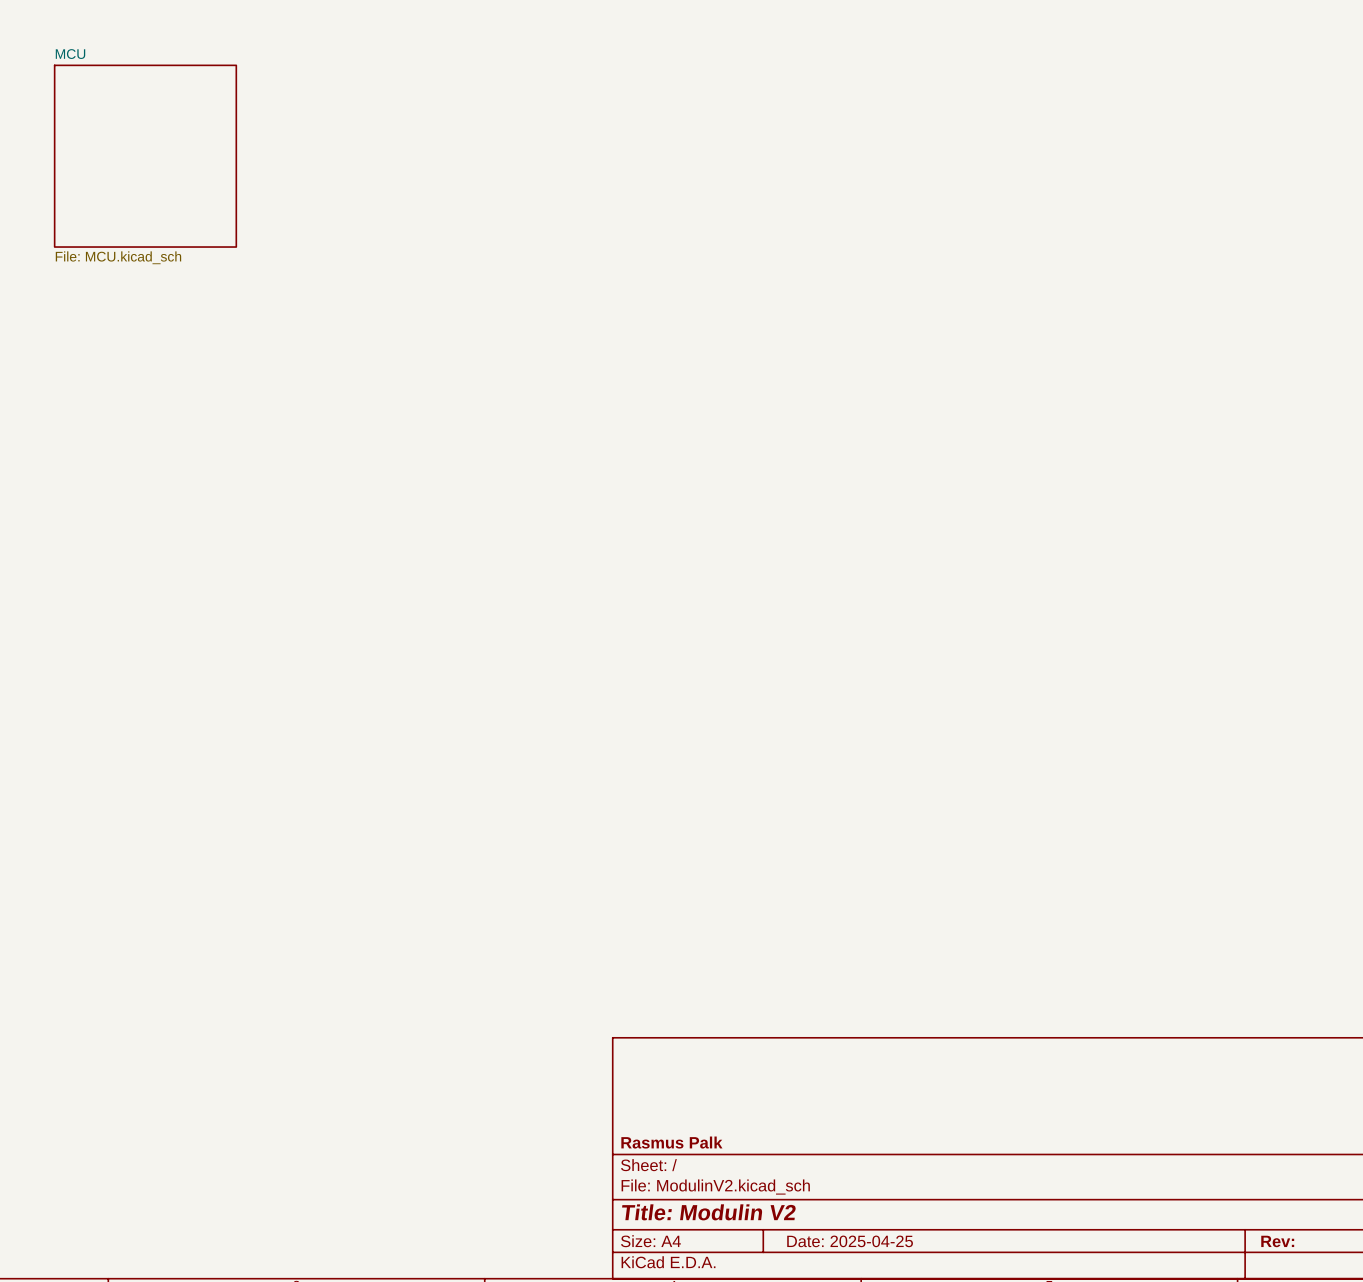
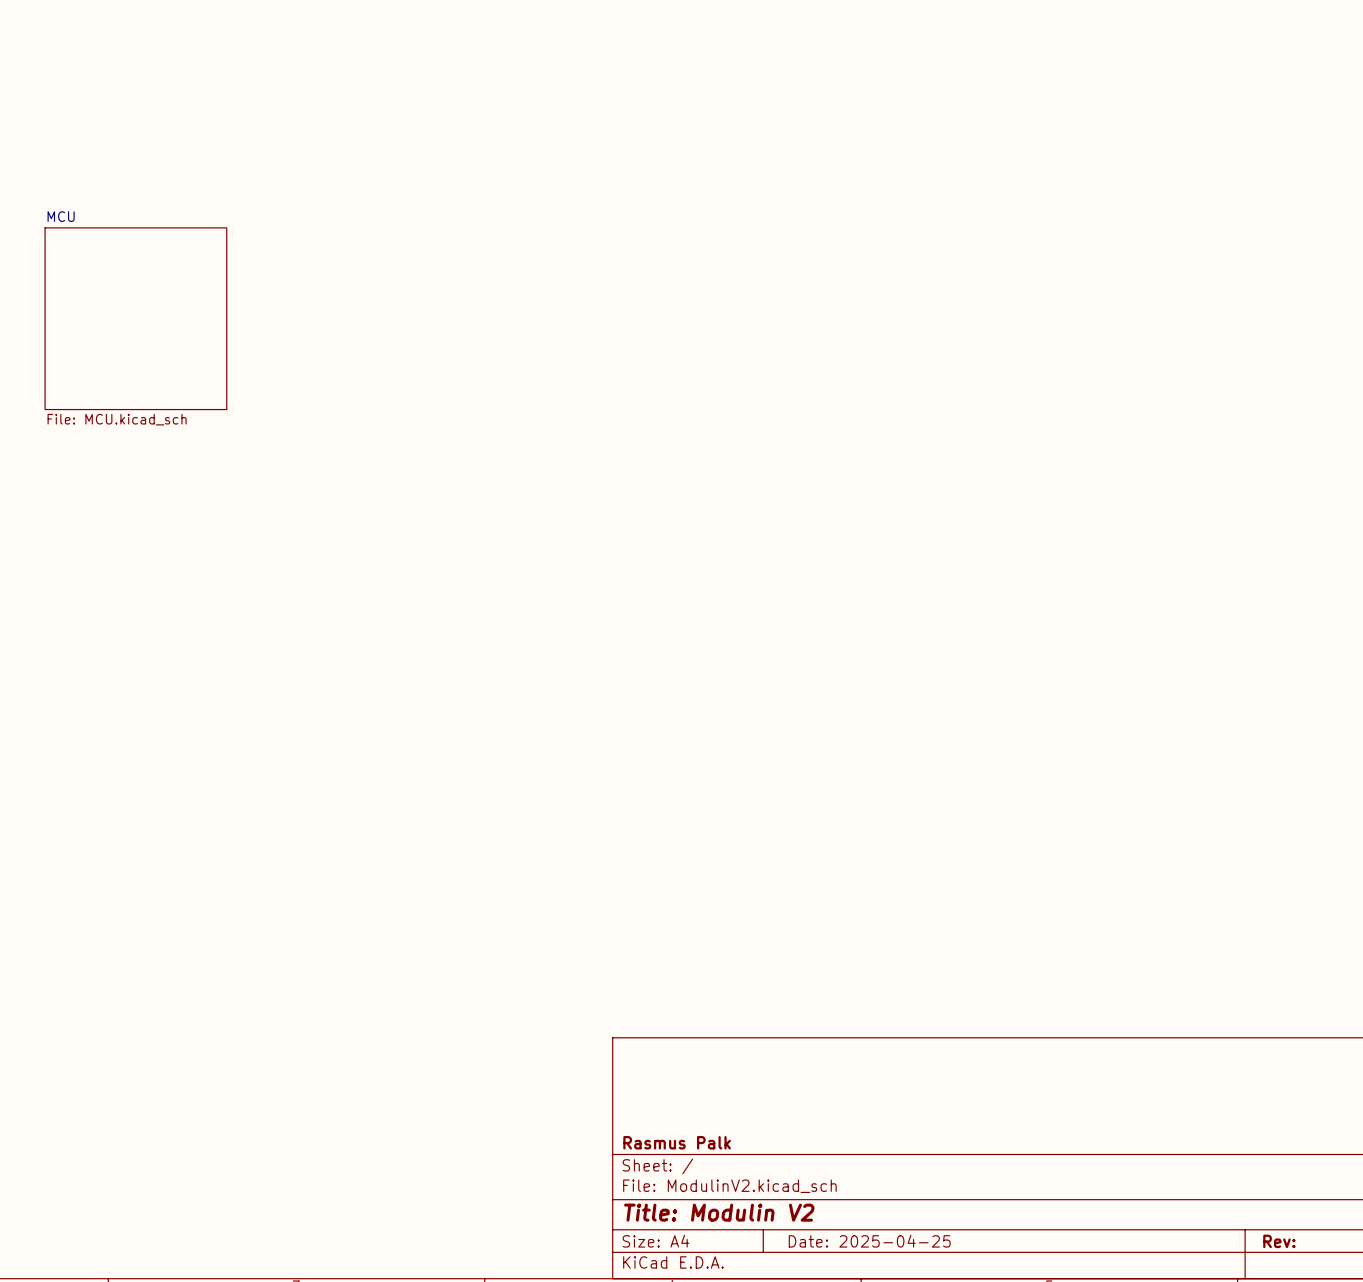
sheet MCU position: (145, 156) -> (135, 318)

